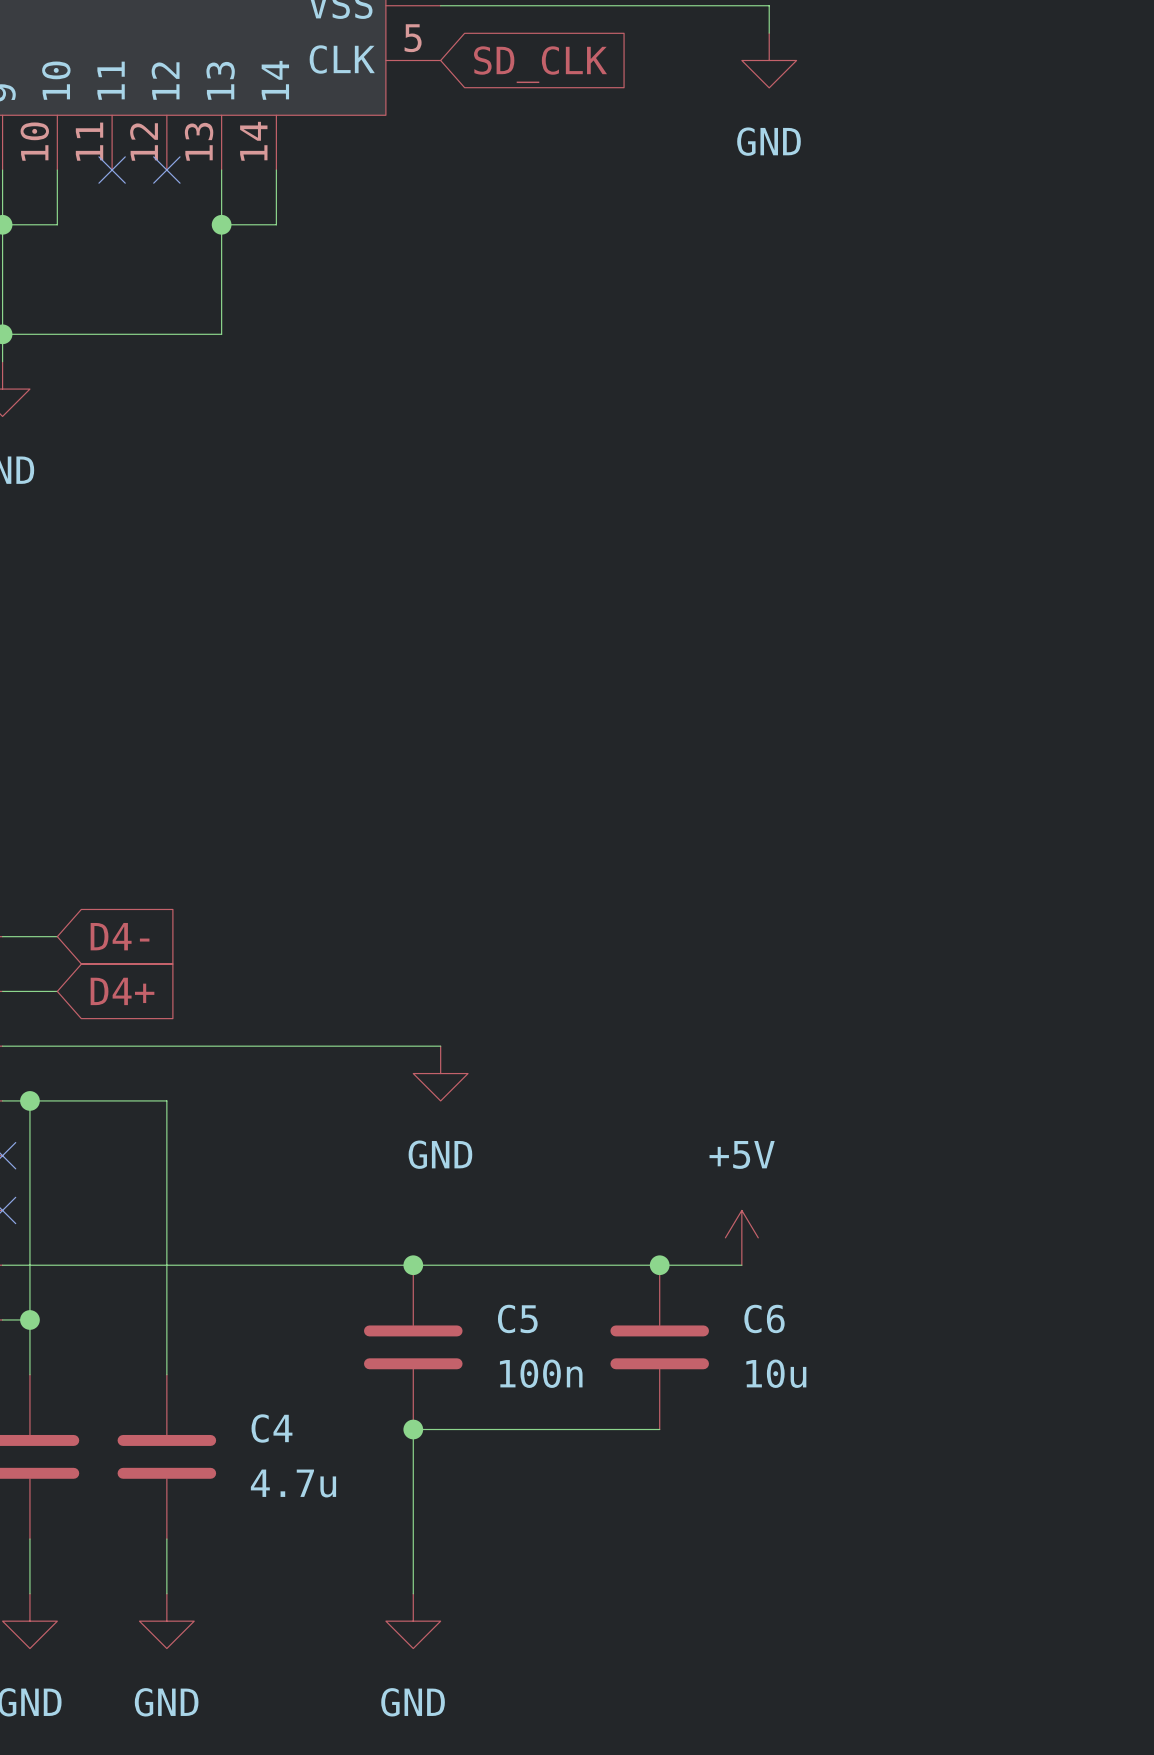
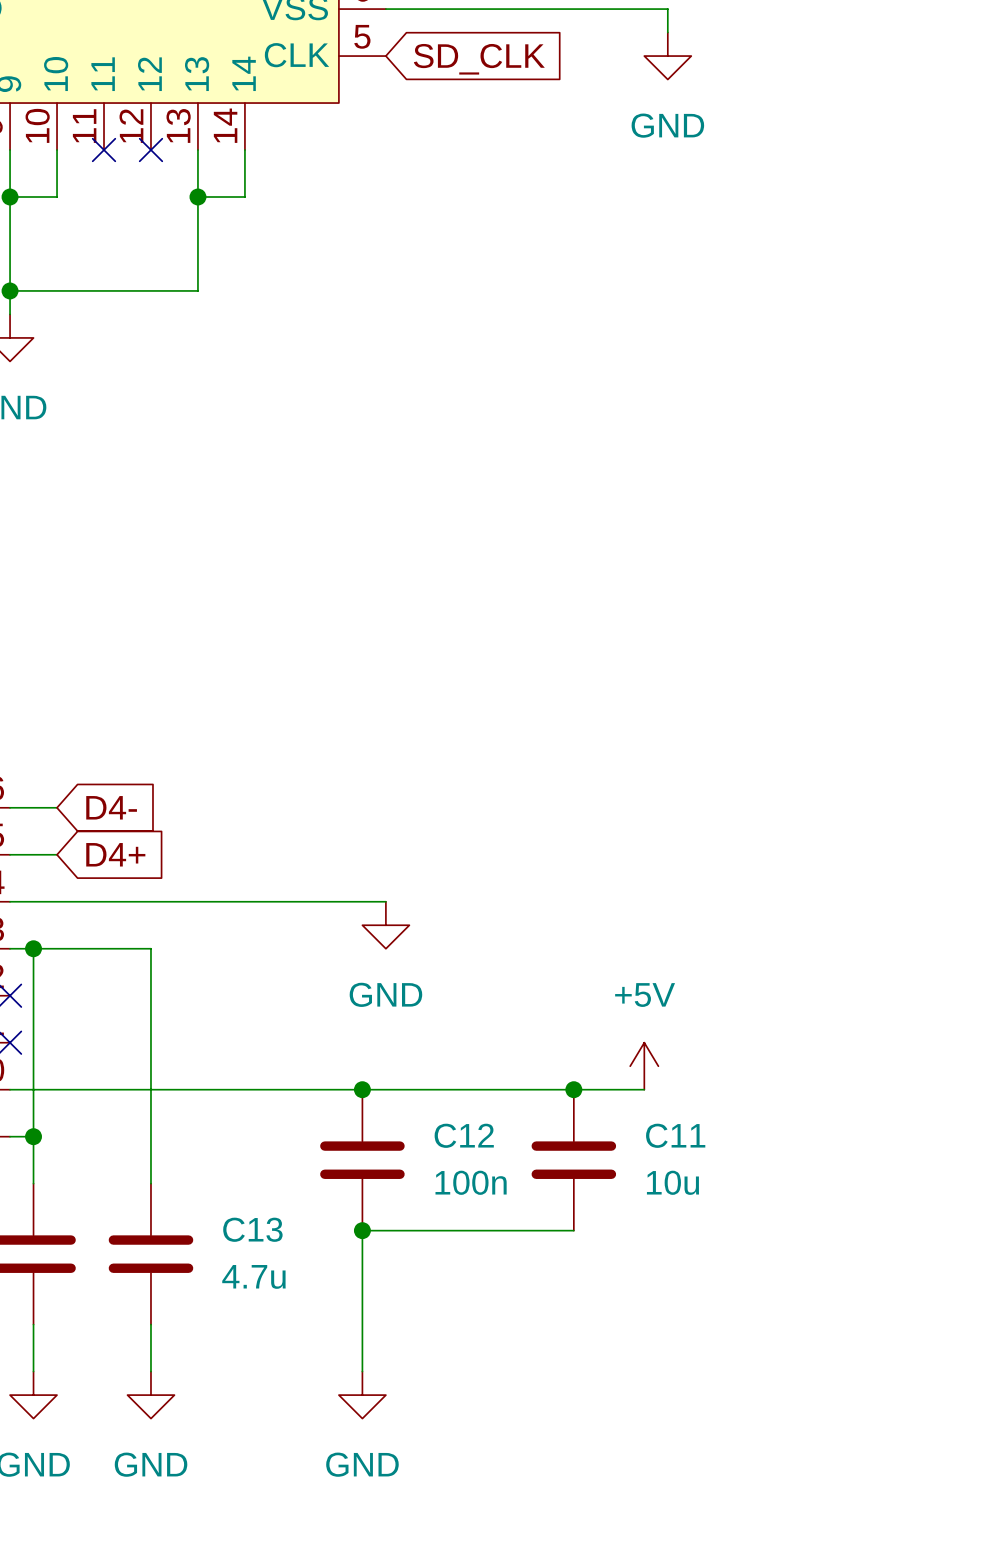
C5 name: C5 (517, 1318) -> C12 (464, 1135)
C6 name: C6 (764, 1318) -> C11 (675, 1135)
C4 name: C4 (271, 1428) -> C13 (252, 1229)

